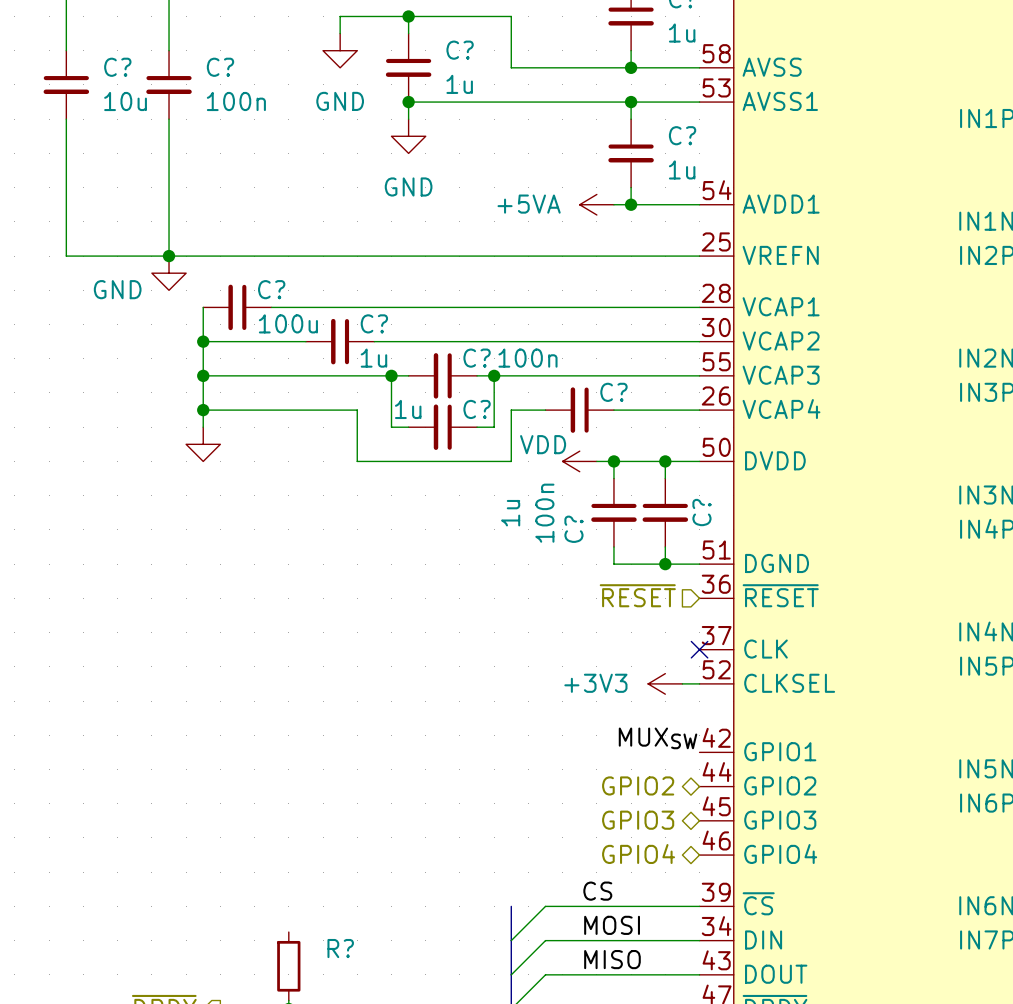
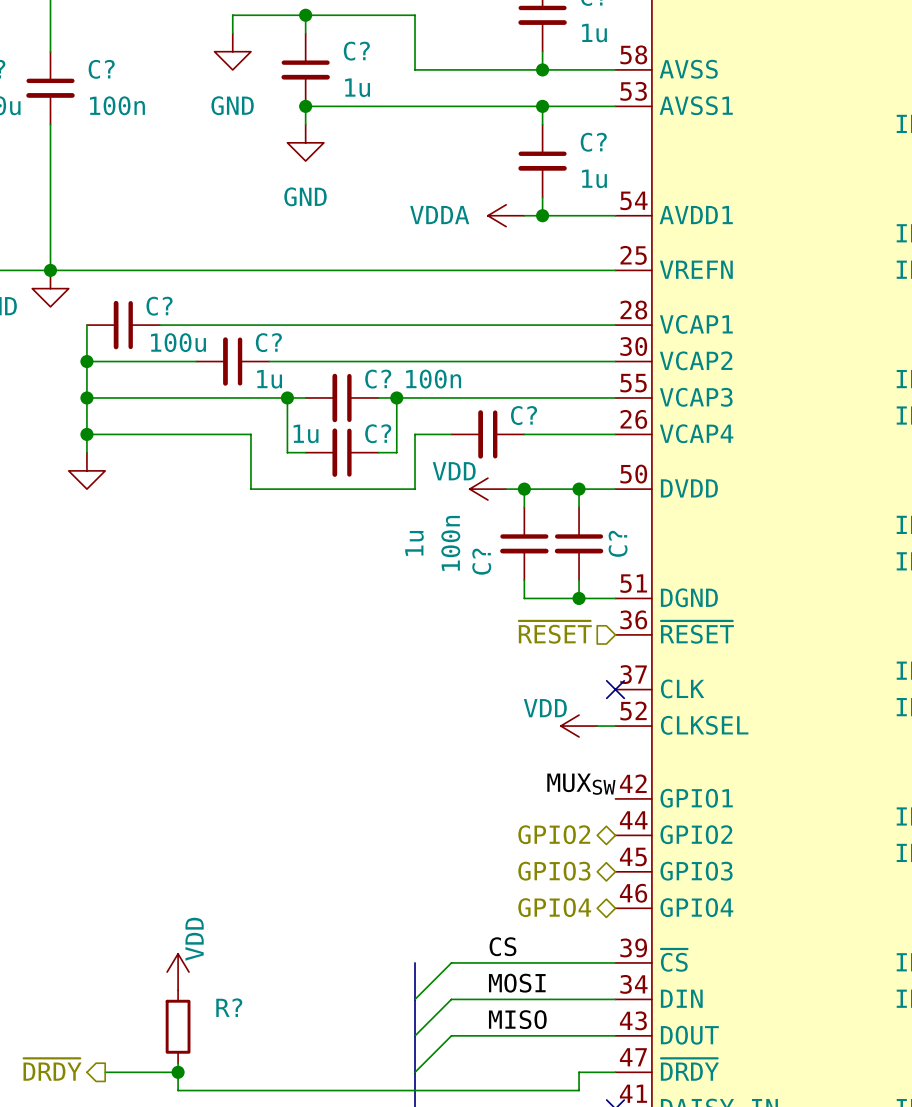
power symbol: +5VA (596, 204) -> VDDA (506, 215)
power symbol: +3V3 (665, 683) -> VDD (579, 726)
power symbol: none -> VDD (178, 972)

